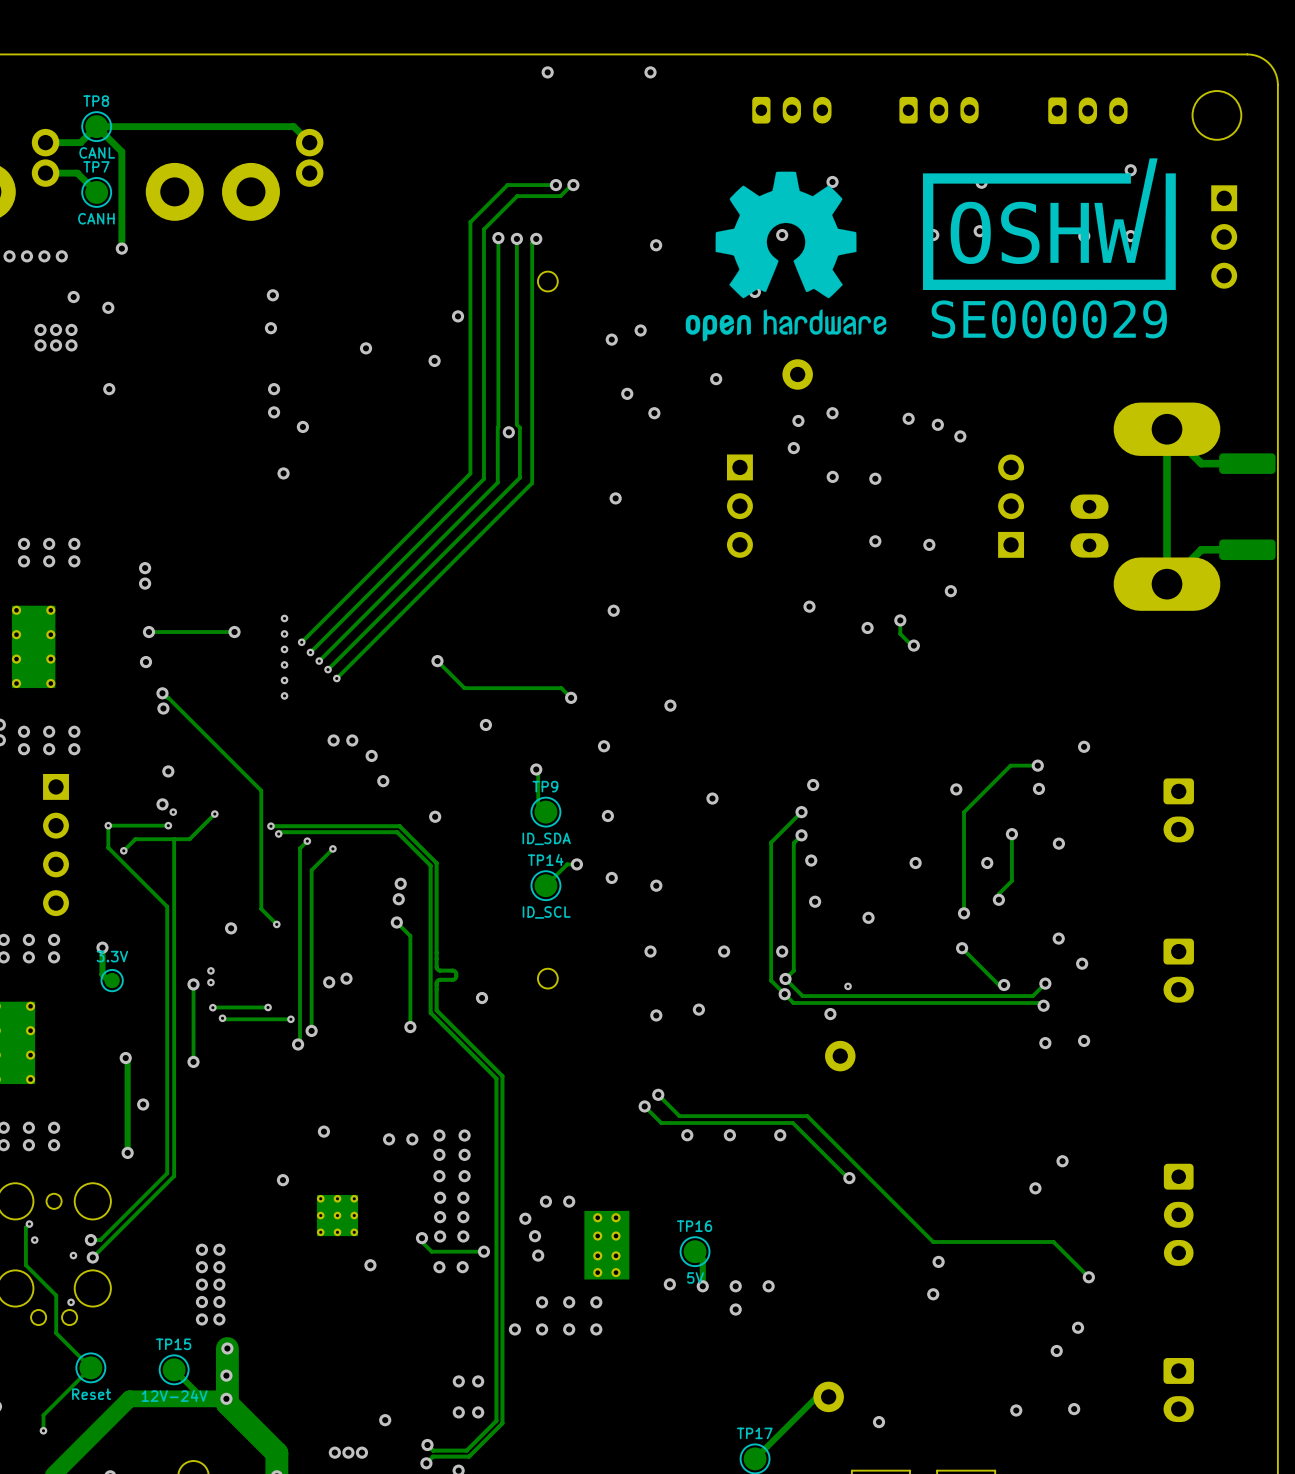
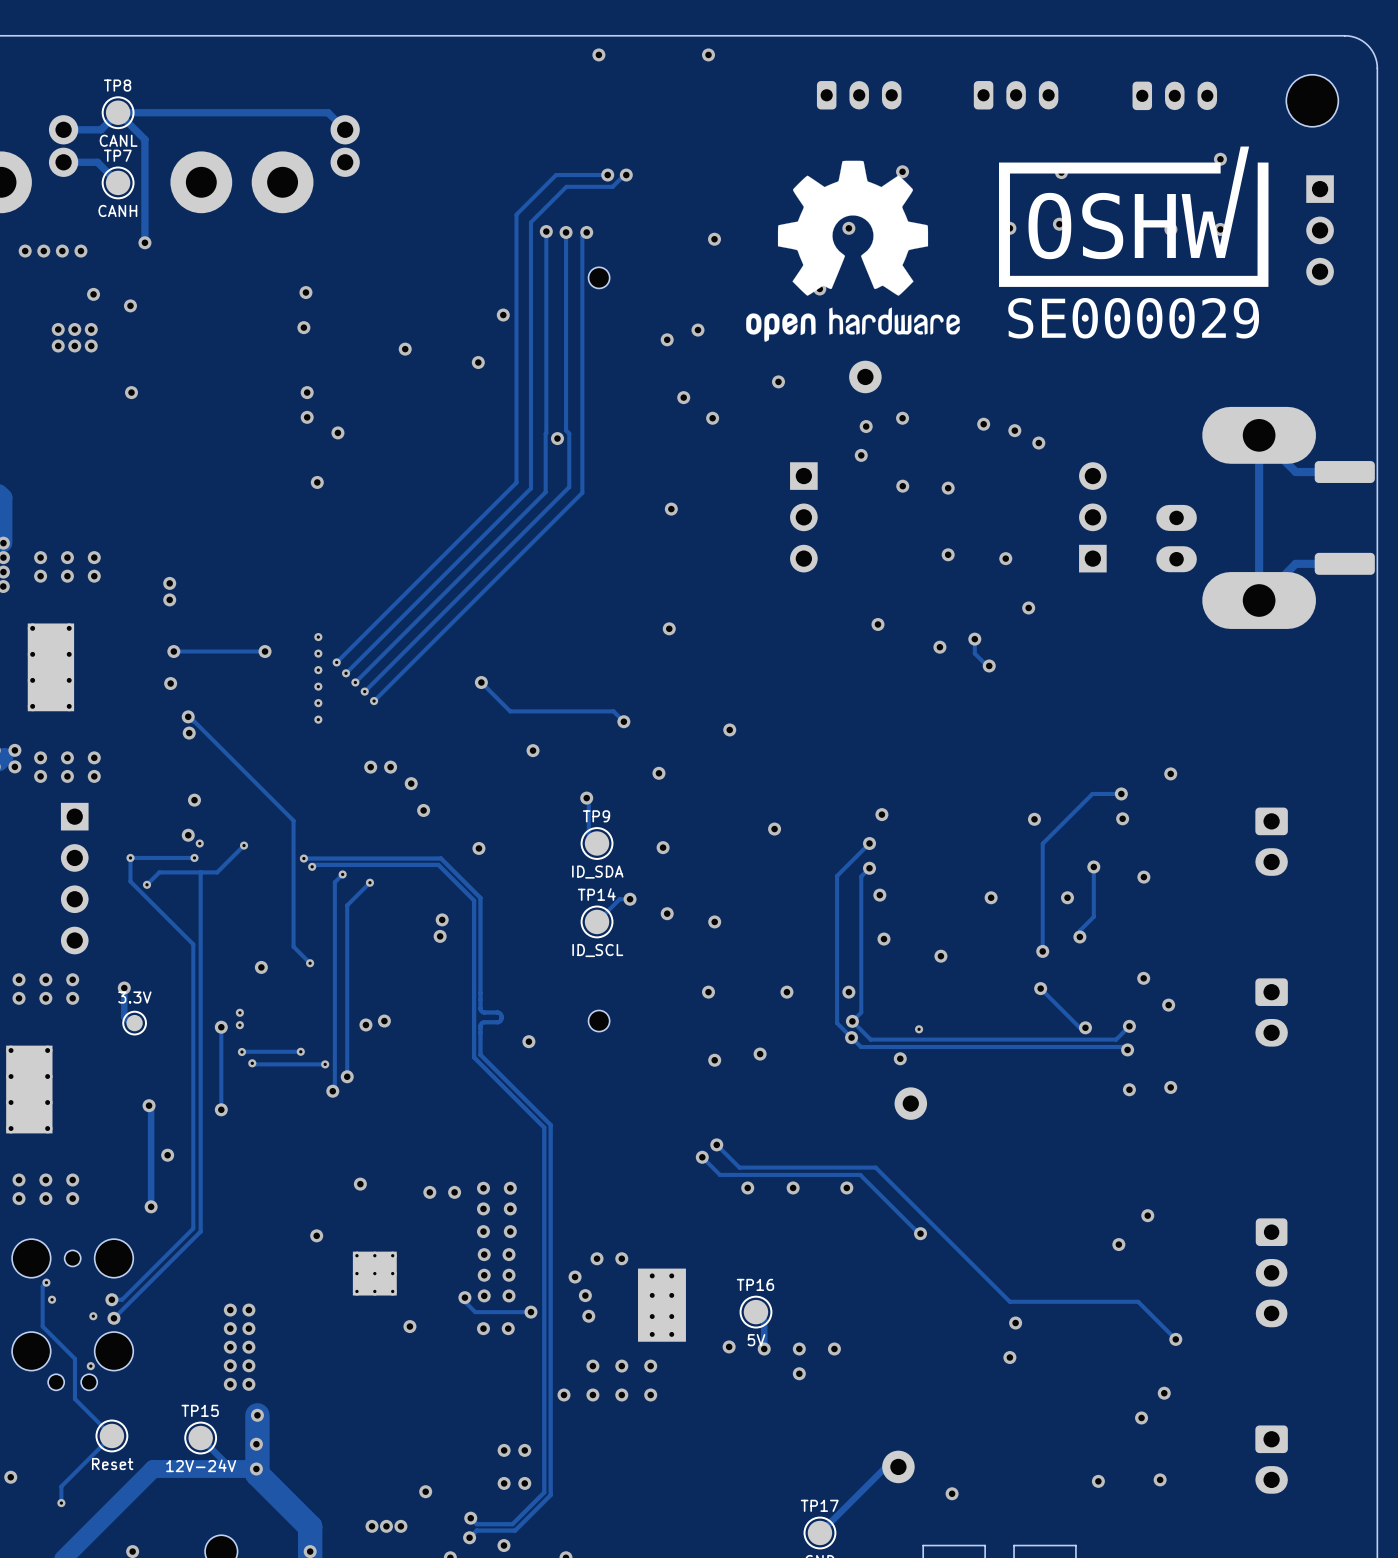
track: (396, 922) (410, 936) (410, 1027) -> none
via: (396, 922) -> none
via: (410, 1027) -> none

